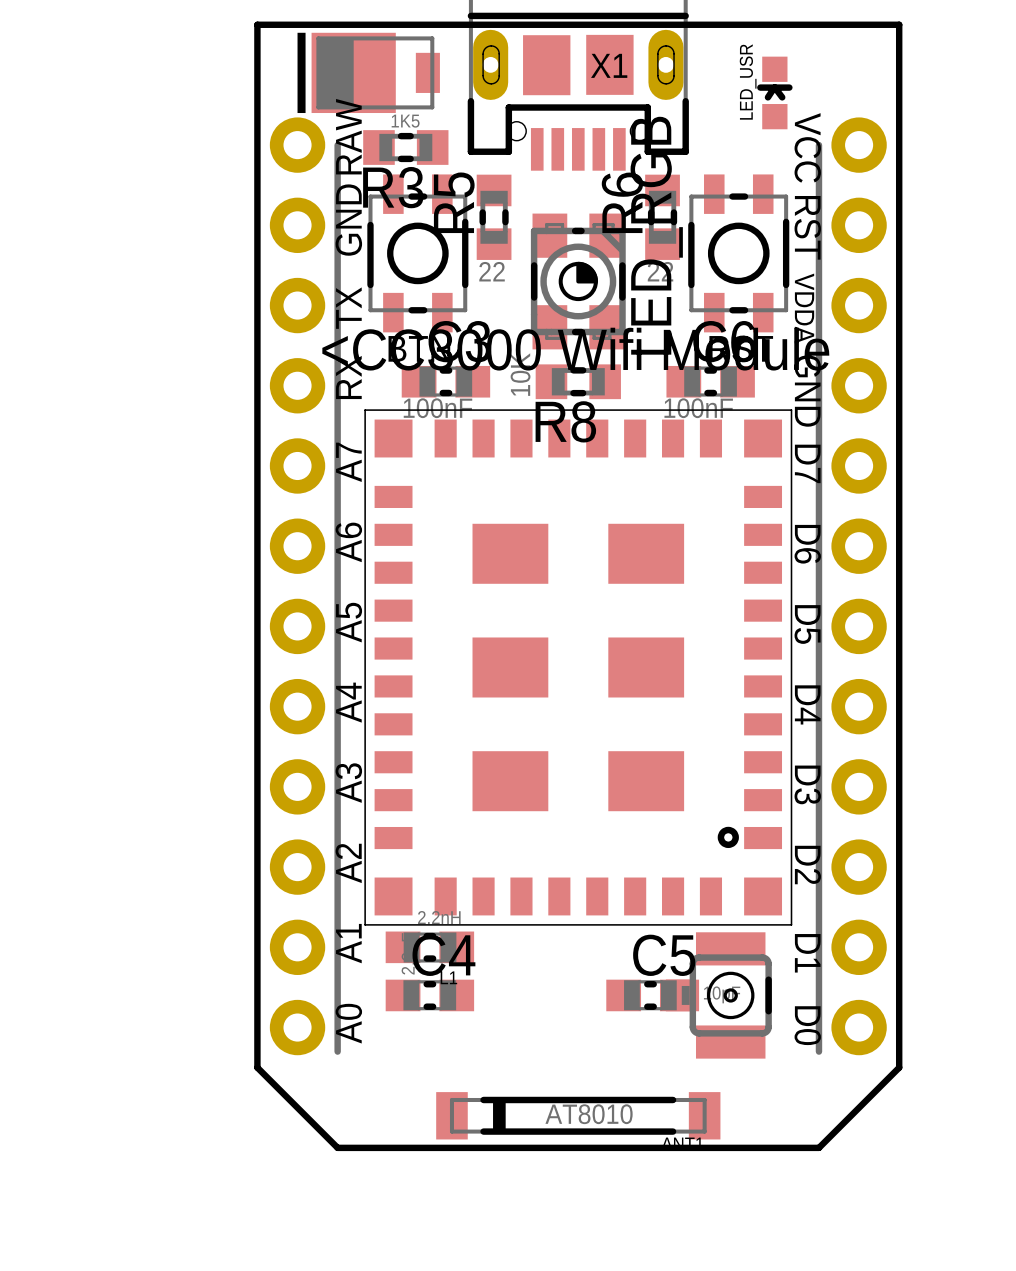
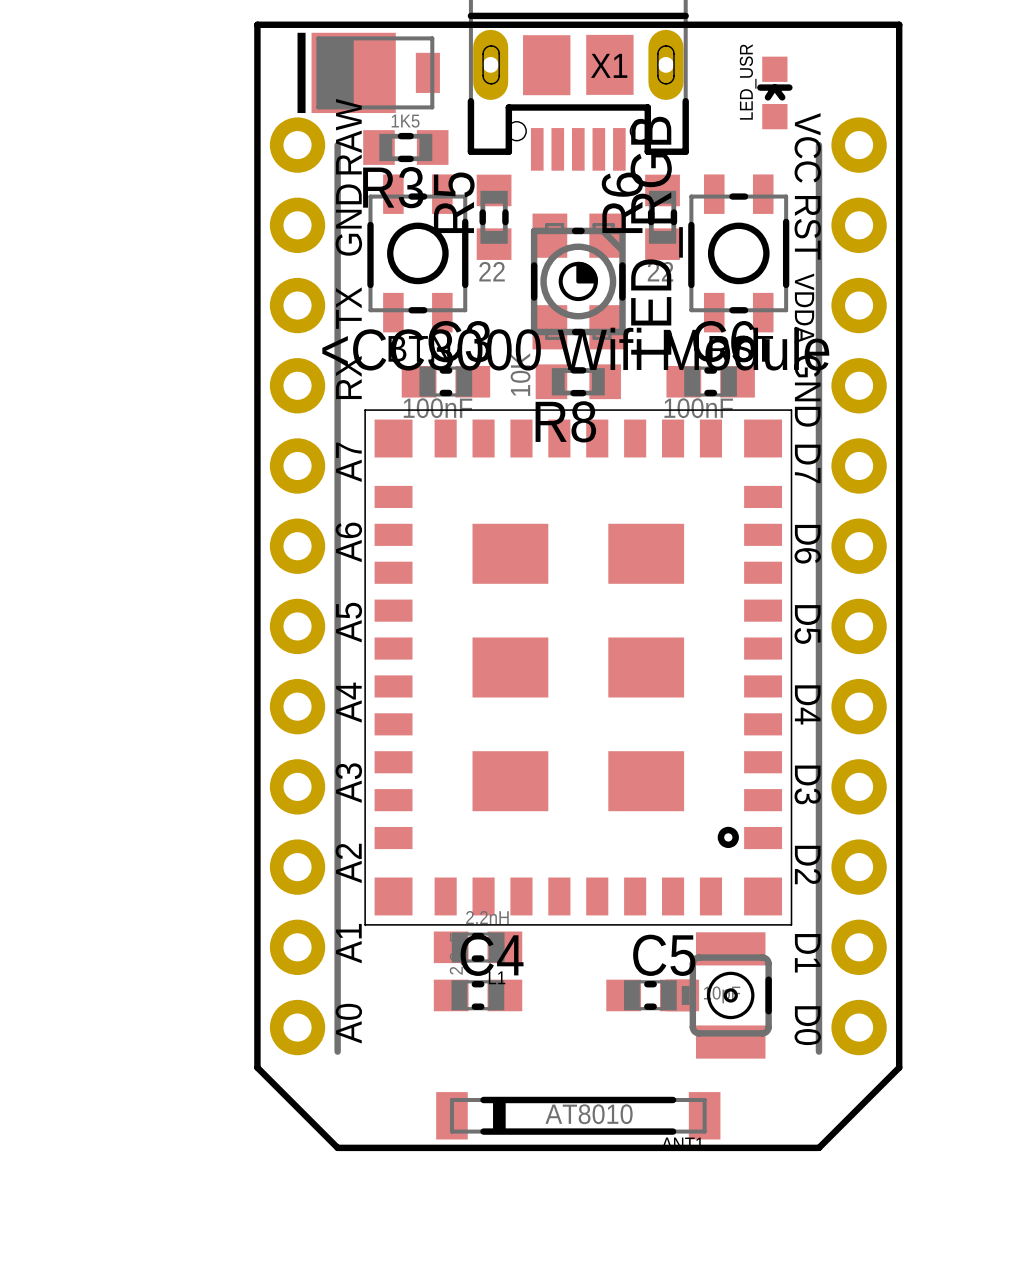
L1 position: (429, 947) -> (478, 947)
C4 position: (429, 995) -> (478, 995)

